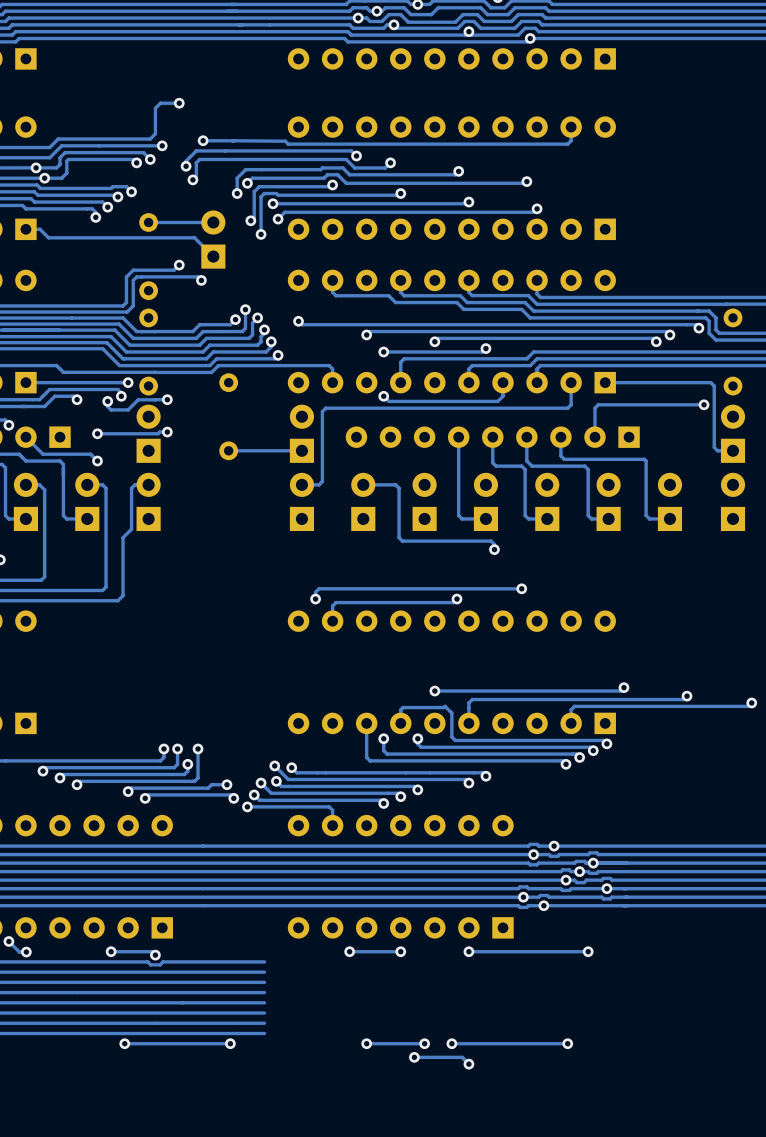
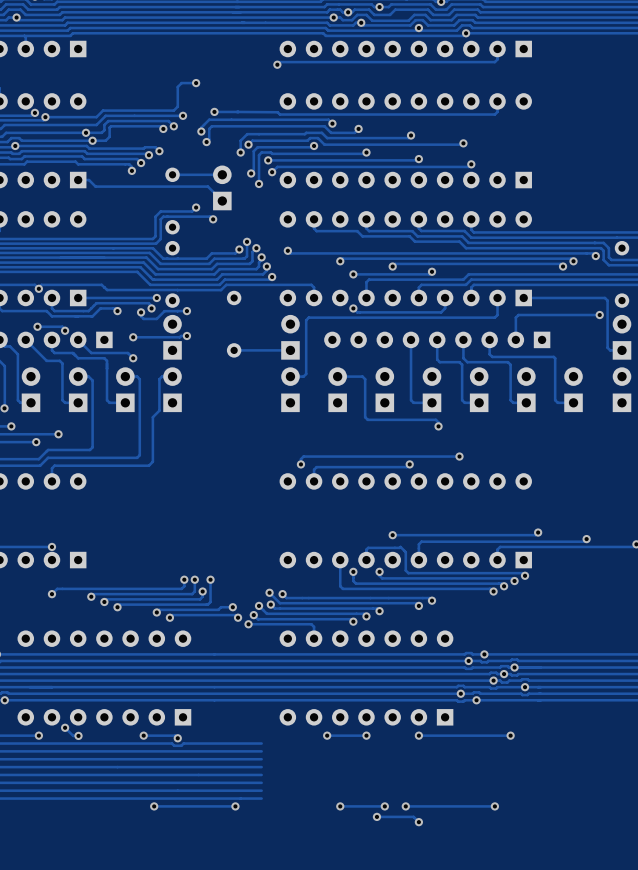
track: none -> (497, 49) (497, 59) (494, 62) (279, 62) (277, 64)
via: none -> (277, 64)

